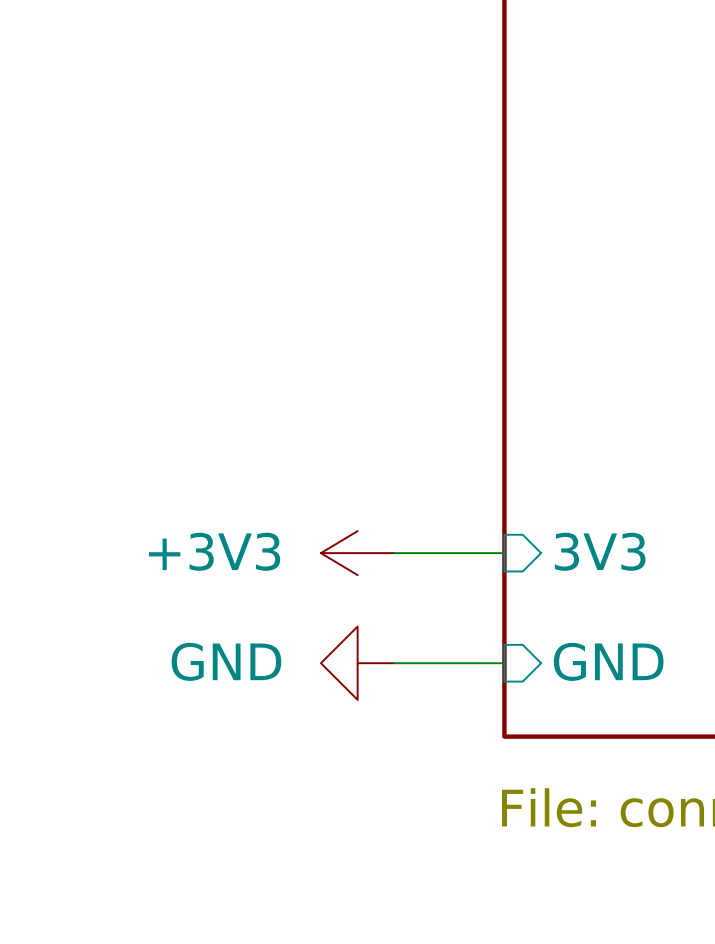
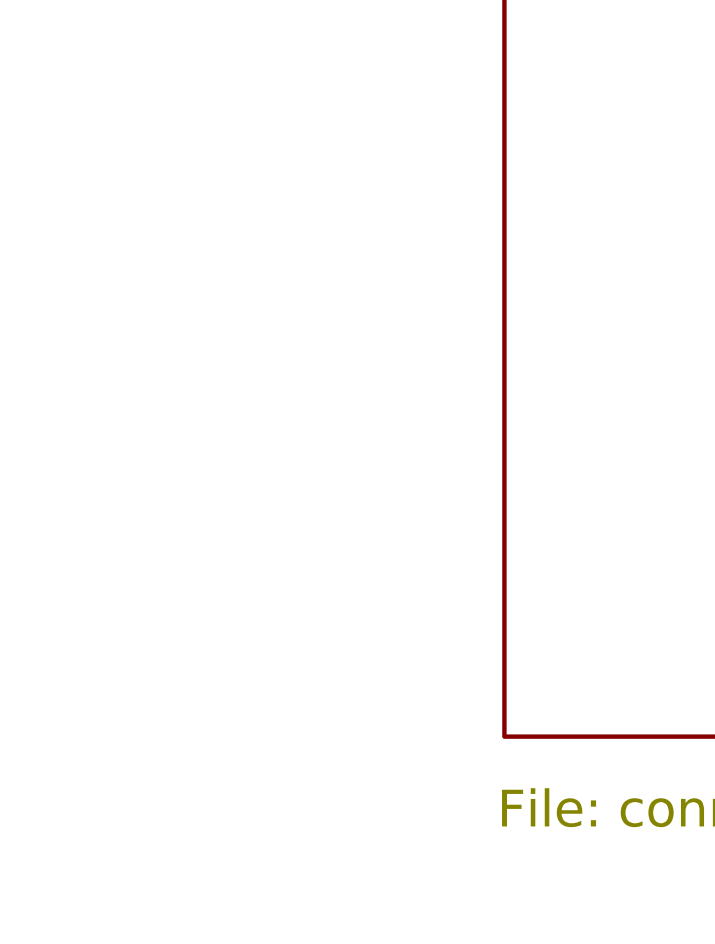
sheet pin: 3V3 (600, 551) -> none
power symbol: +3V3 (357, 553) -> none
wire: (394, 553) (504, 553) -> none
sheet pin: GND (608, 661) -> none
power symbol: GND (357, 663) -> none
wire: (394, 663) (504, 663) -> none

